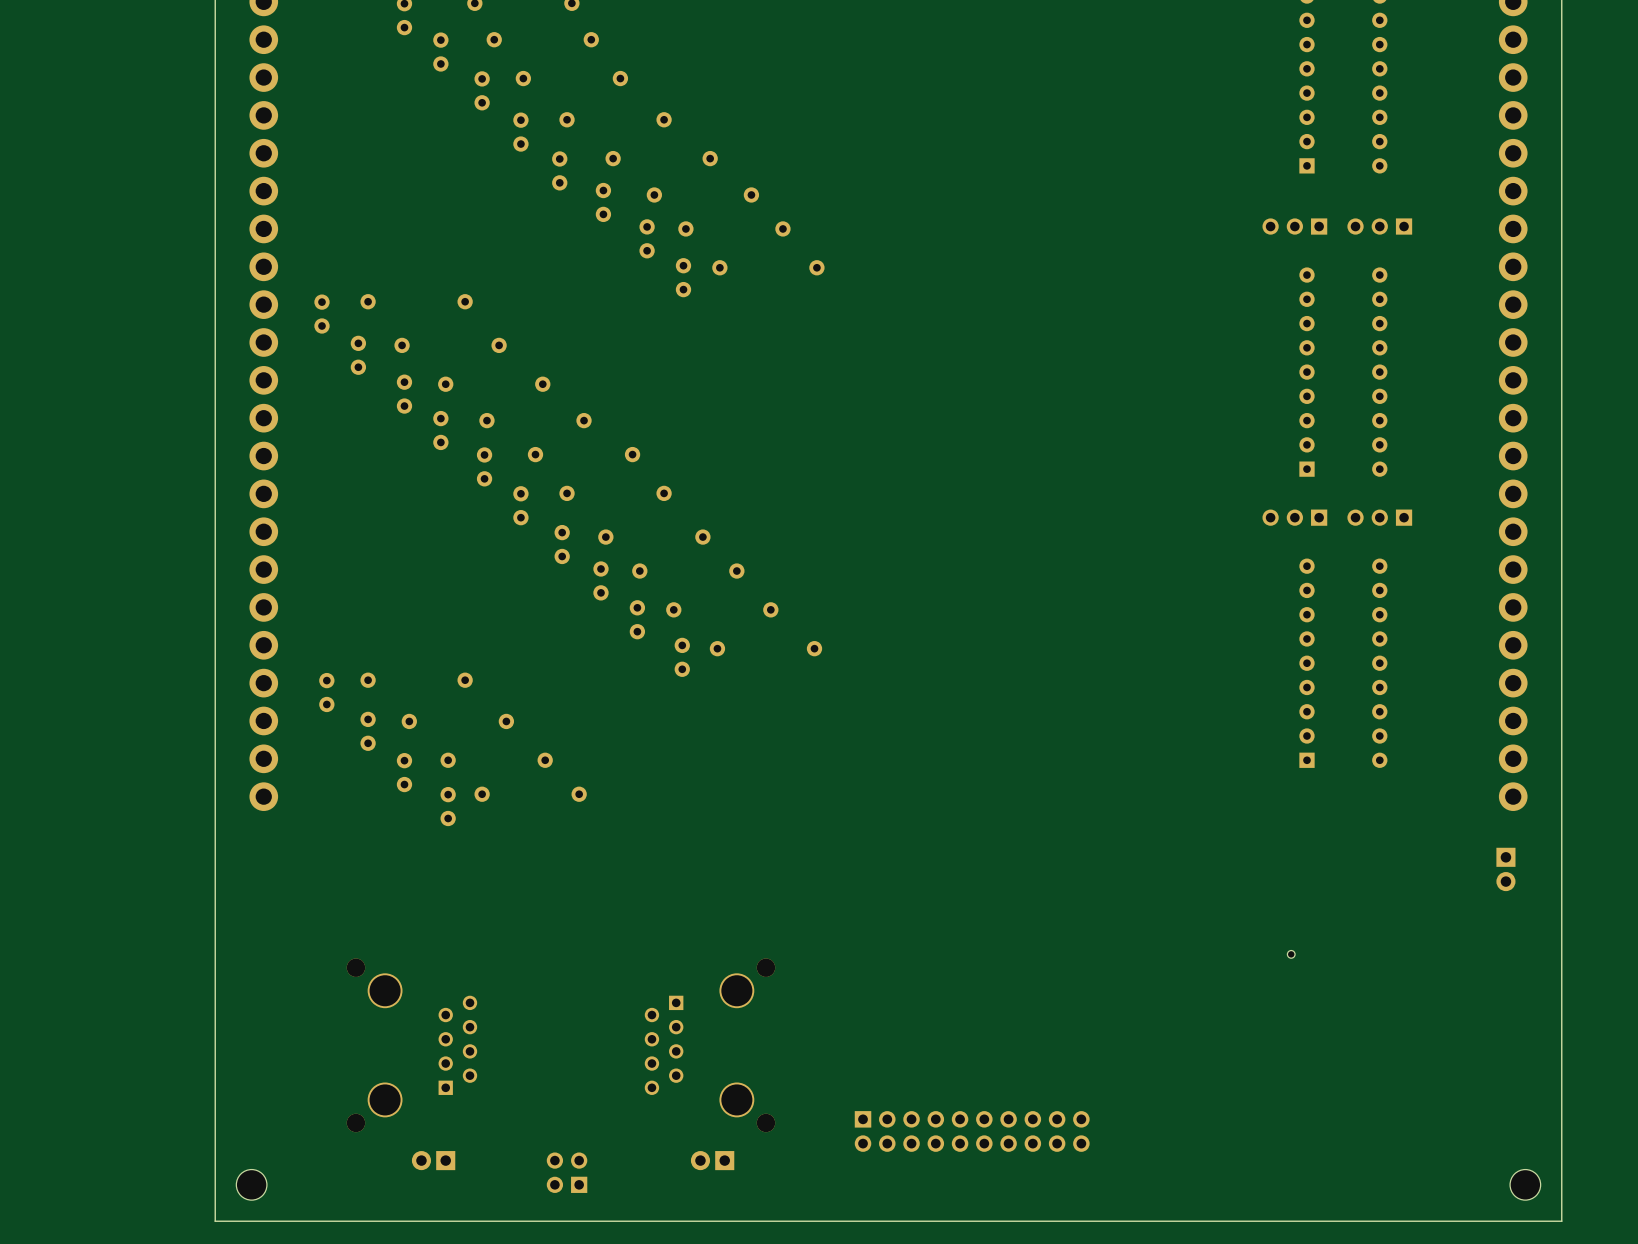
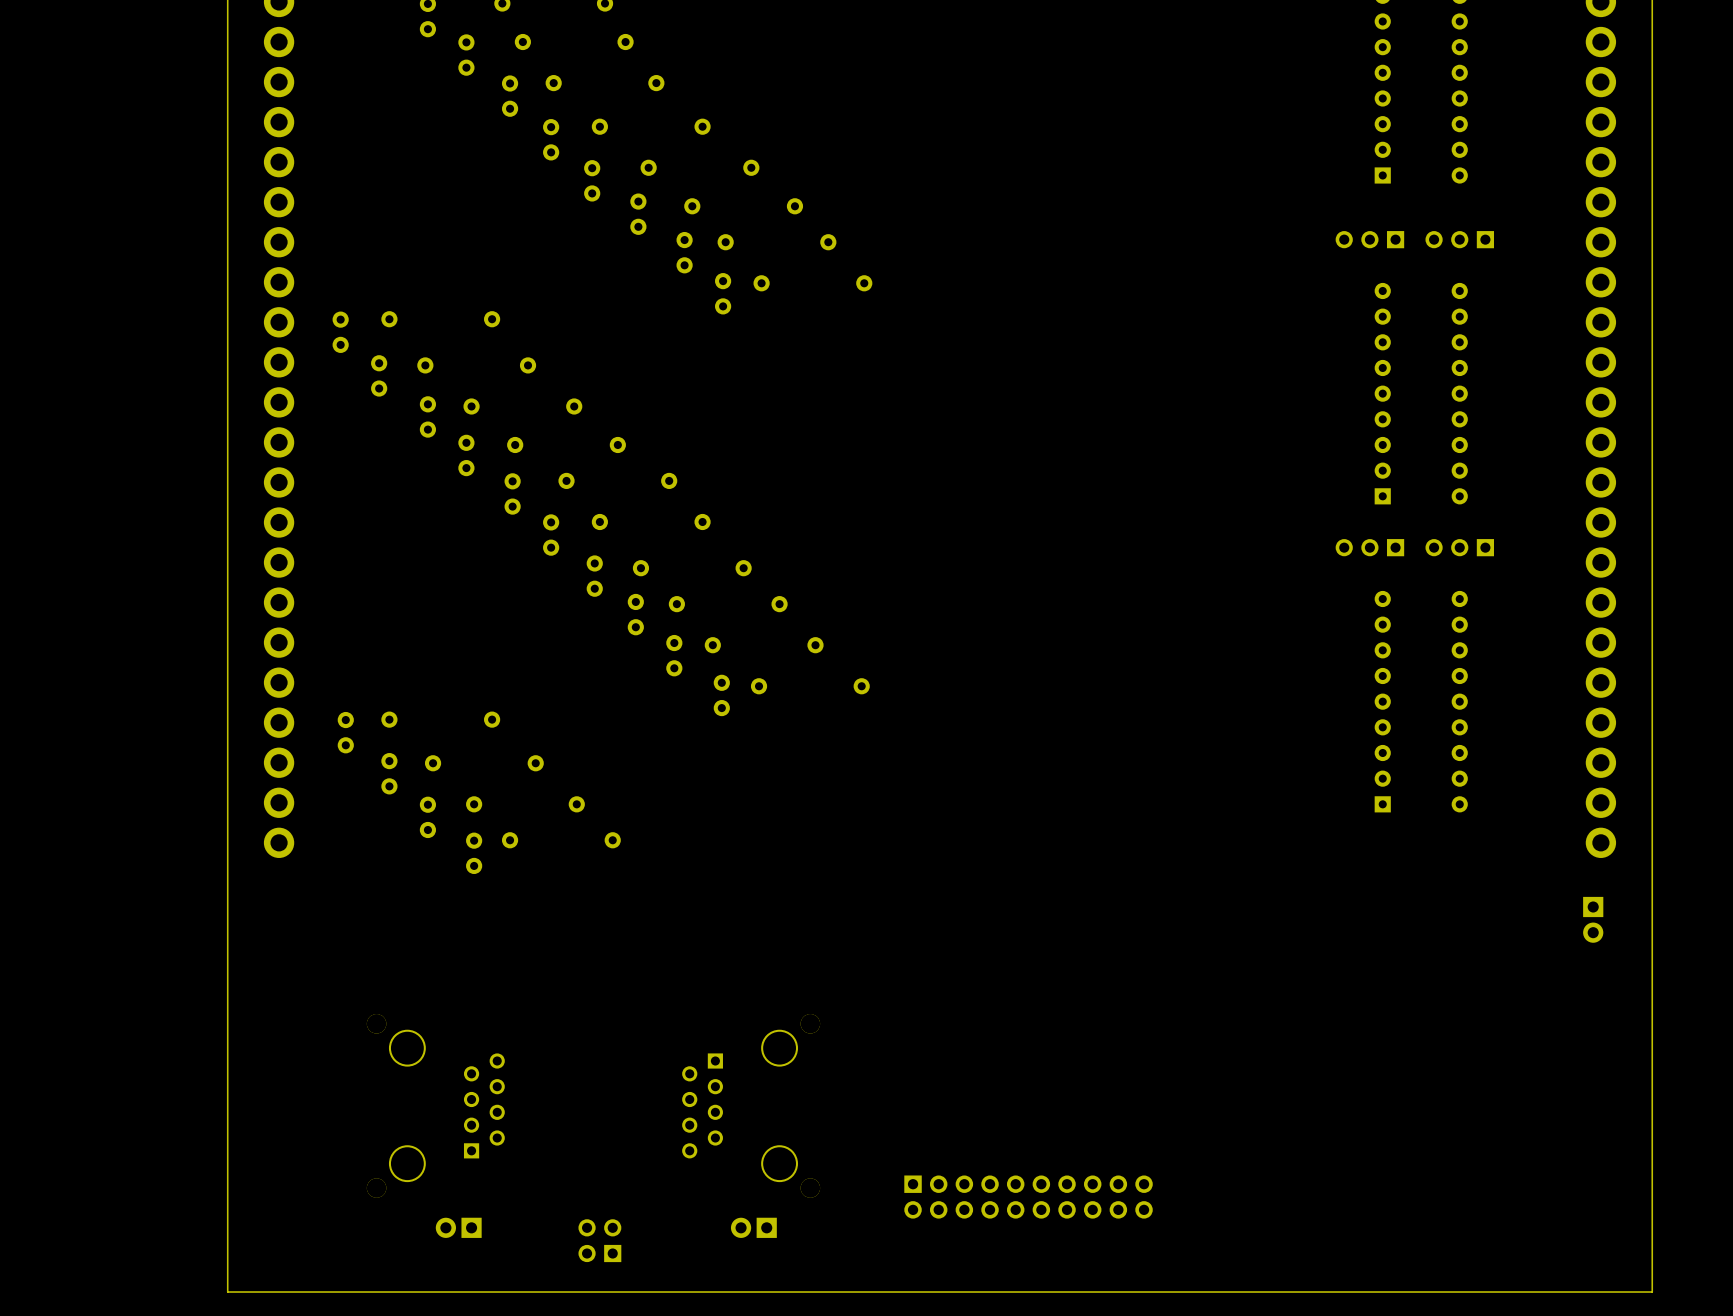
part: (1291, 954) -> none
part: (251, 1184) -> none
part: (1525, 1184) -> none

